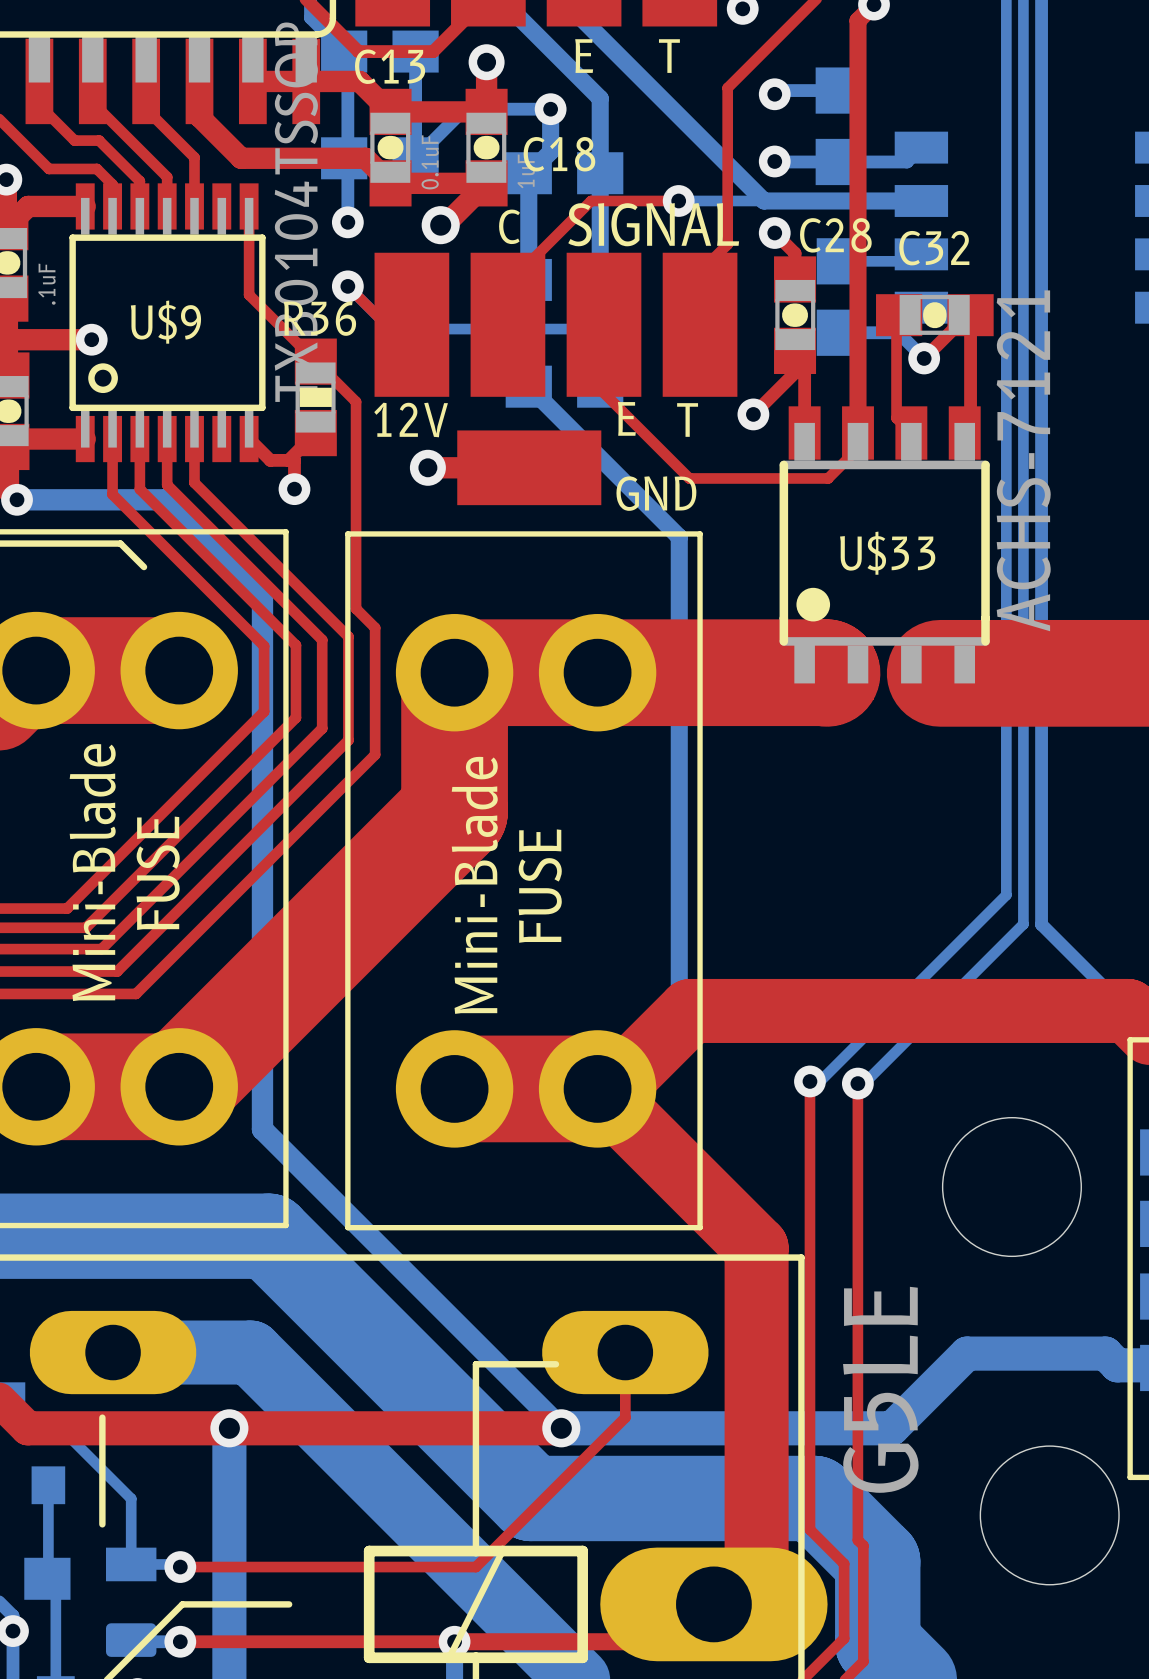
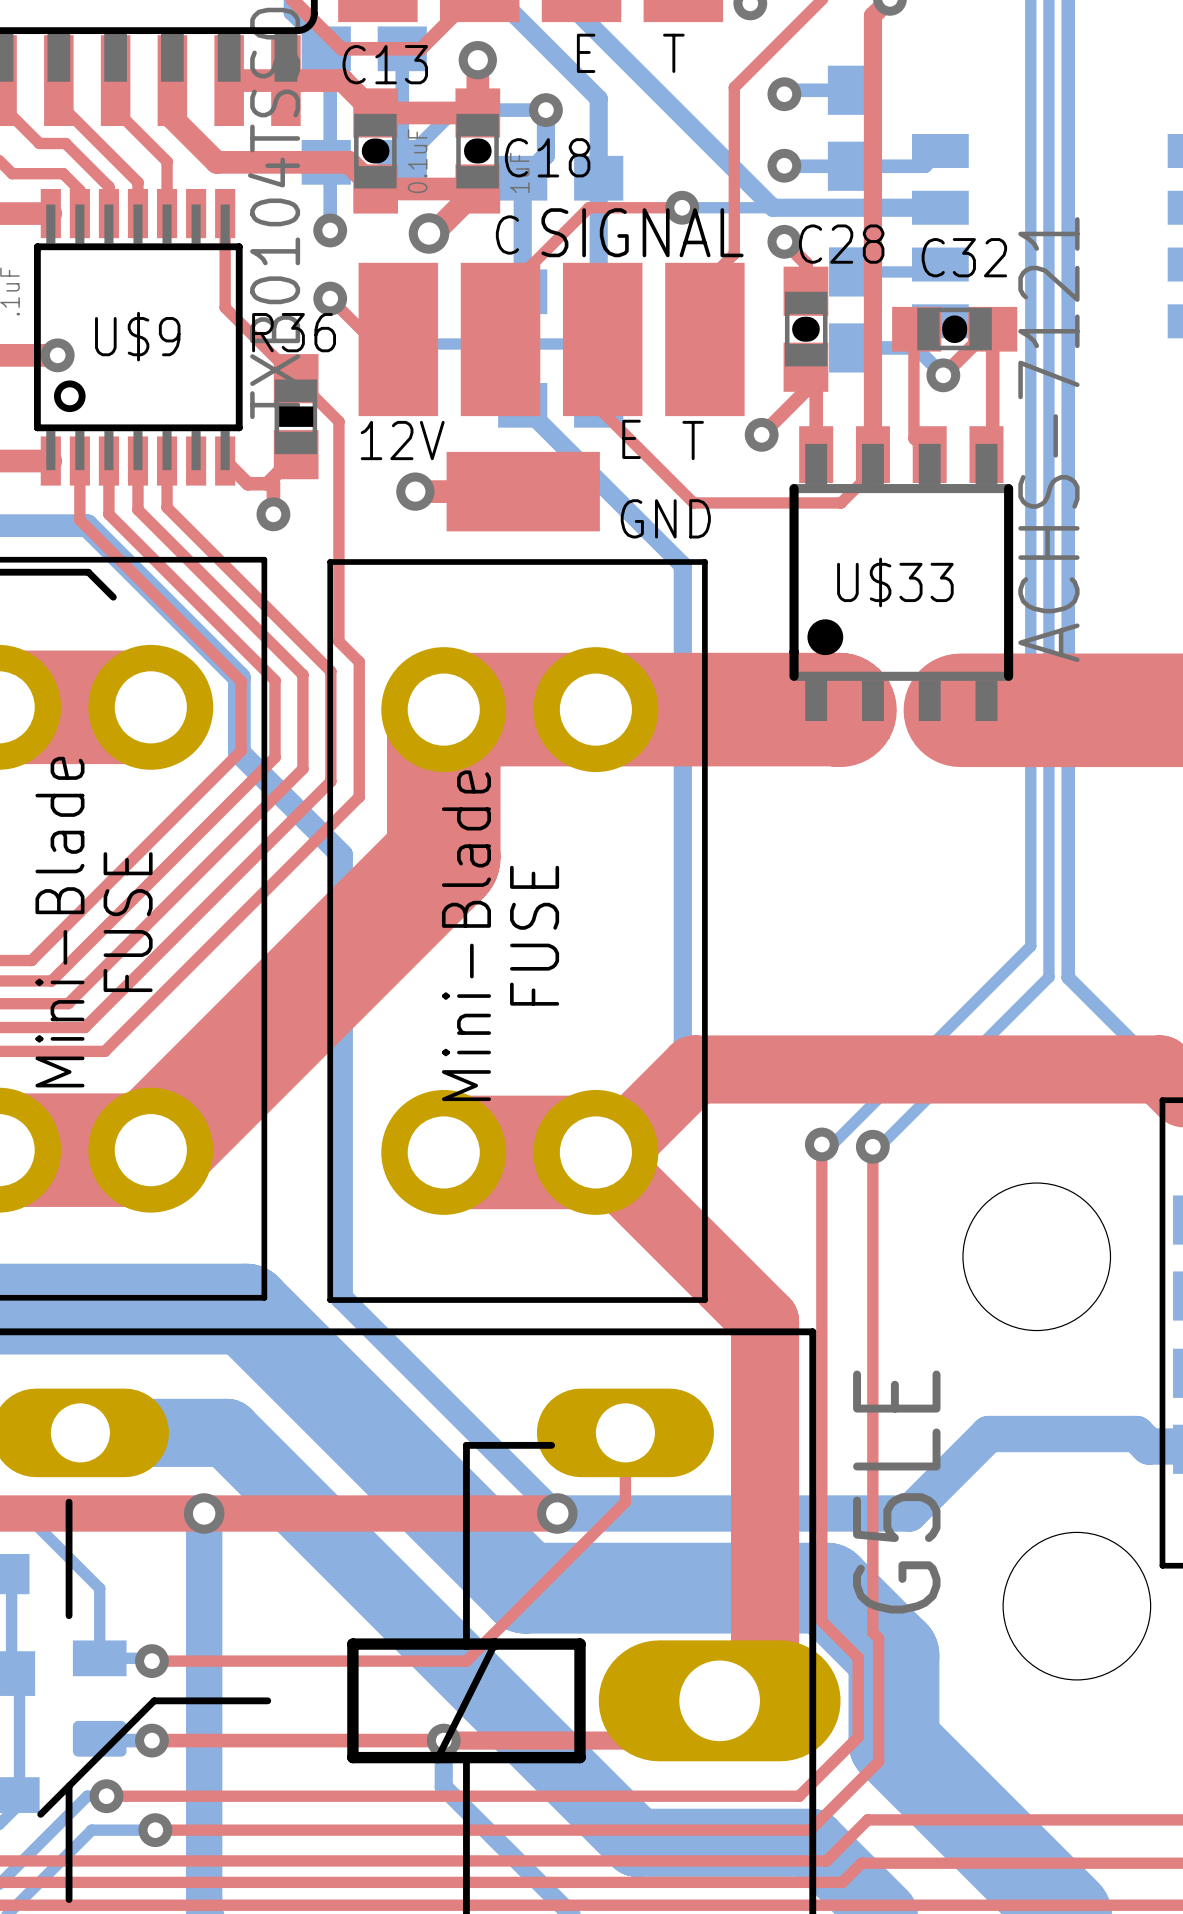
bottom track: (119, 499) (166, 499) (262, 595) (262, 642) -> (87, 525) (239, 677)
bottom track: (262, 713) (262, 1129) (358, 1225) -> (239, 752) (341, 854) (341, 1297)

